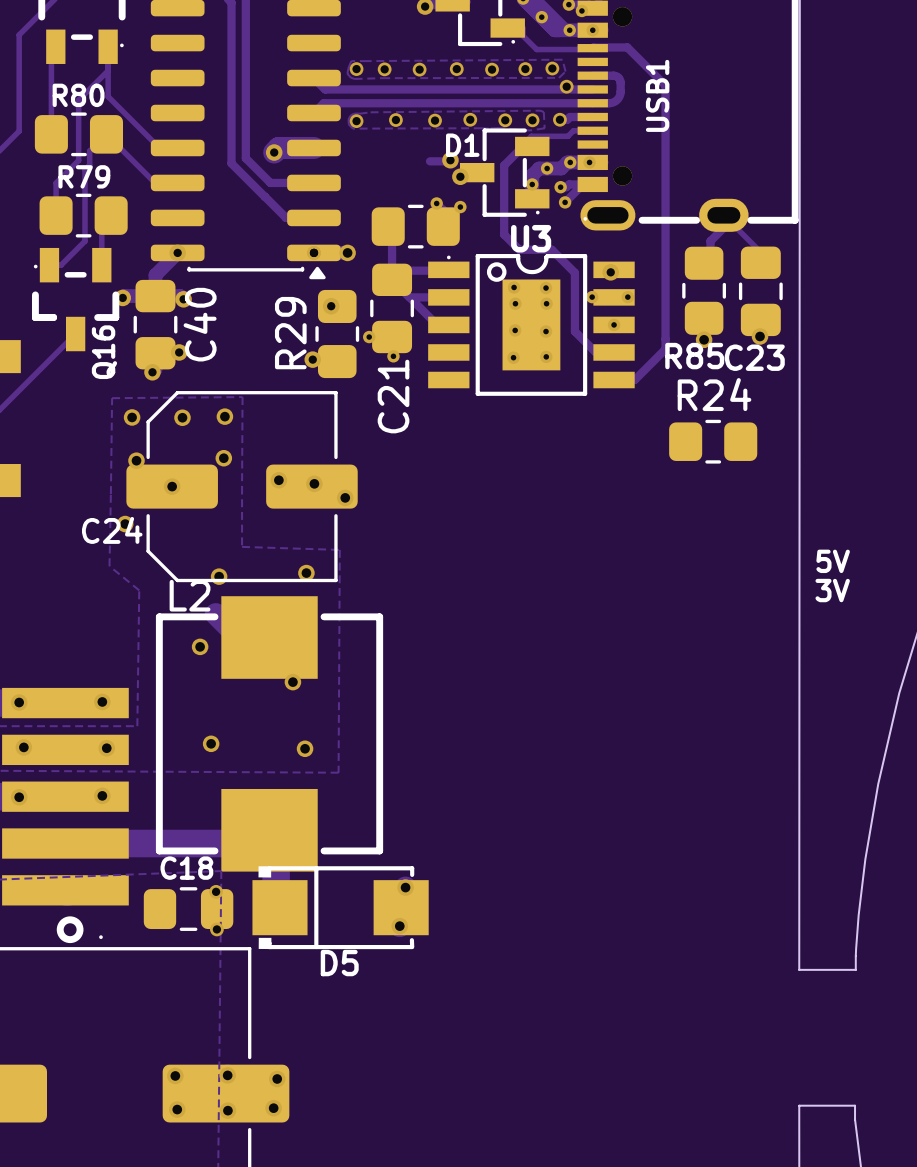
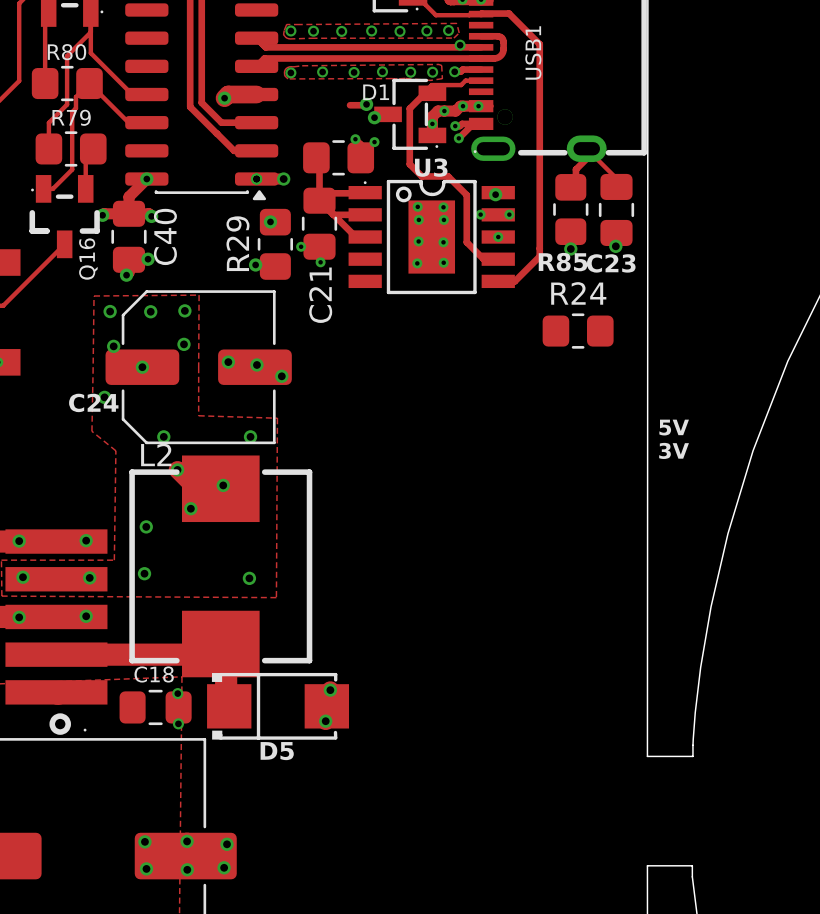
via: none -> (163, 436)
via: (219, 576) -> none
via: none -> (177, 469)
via: none -> (223, 485)
via: (200, 646) -> none
via: none -> (190, 508)
via: (292, 682) -> none
via: none -> (146, 526)
via: none -> (144, 573)
via: (211, 743) -> none

